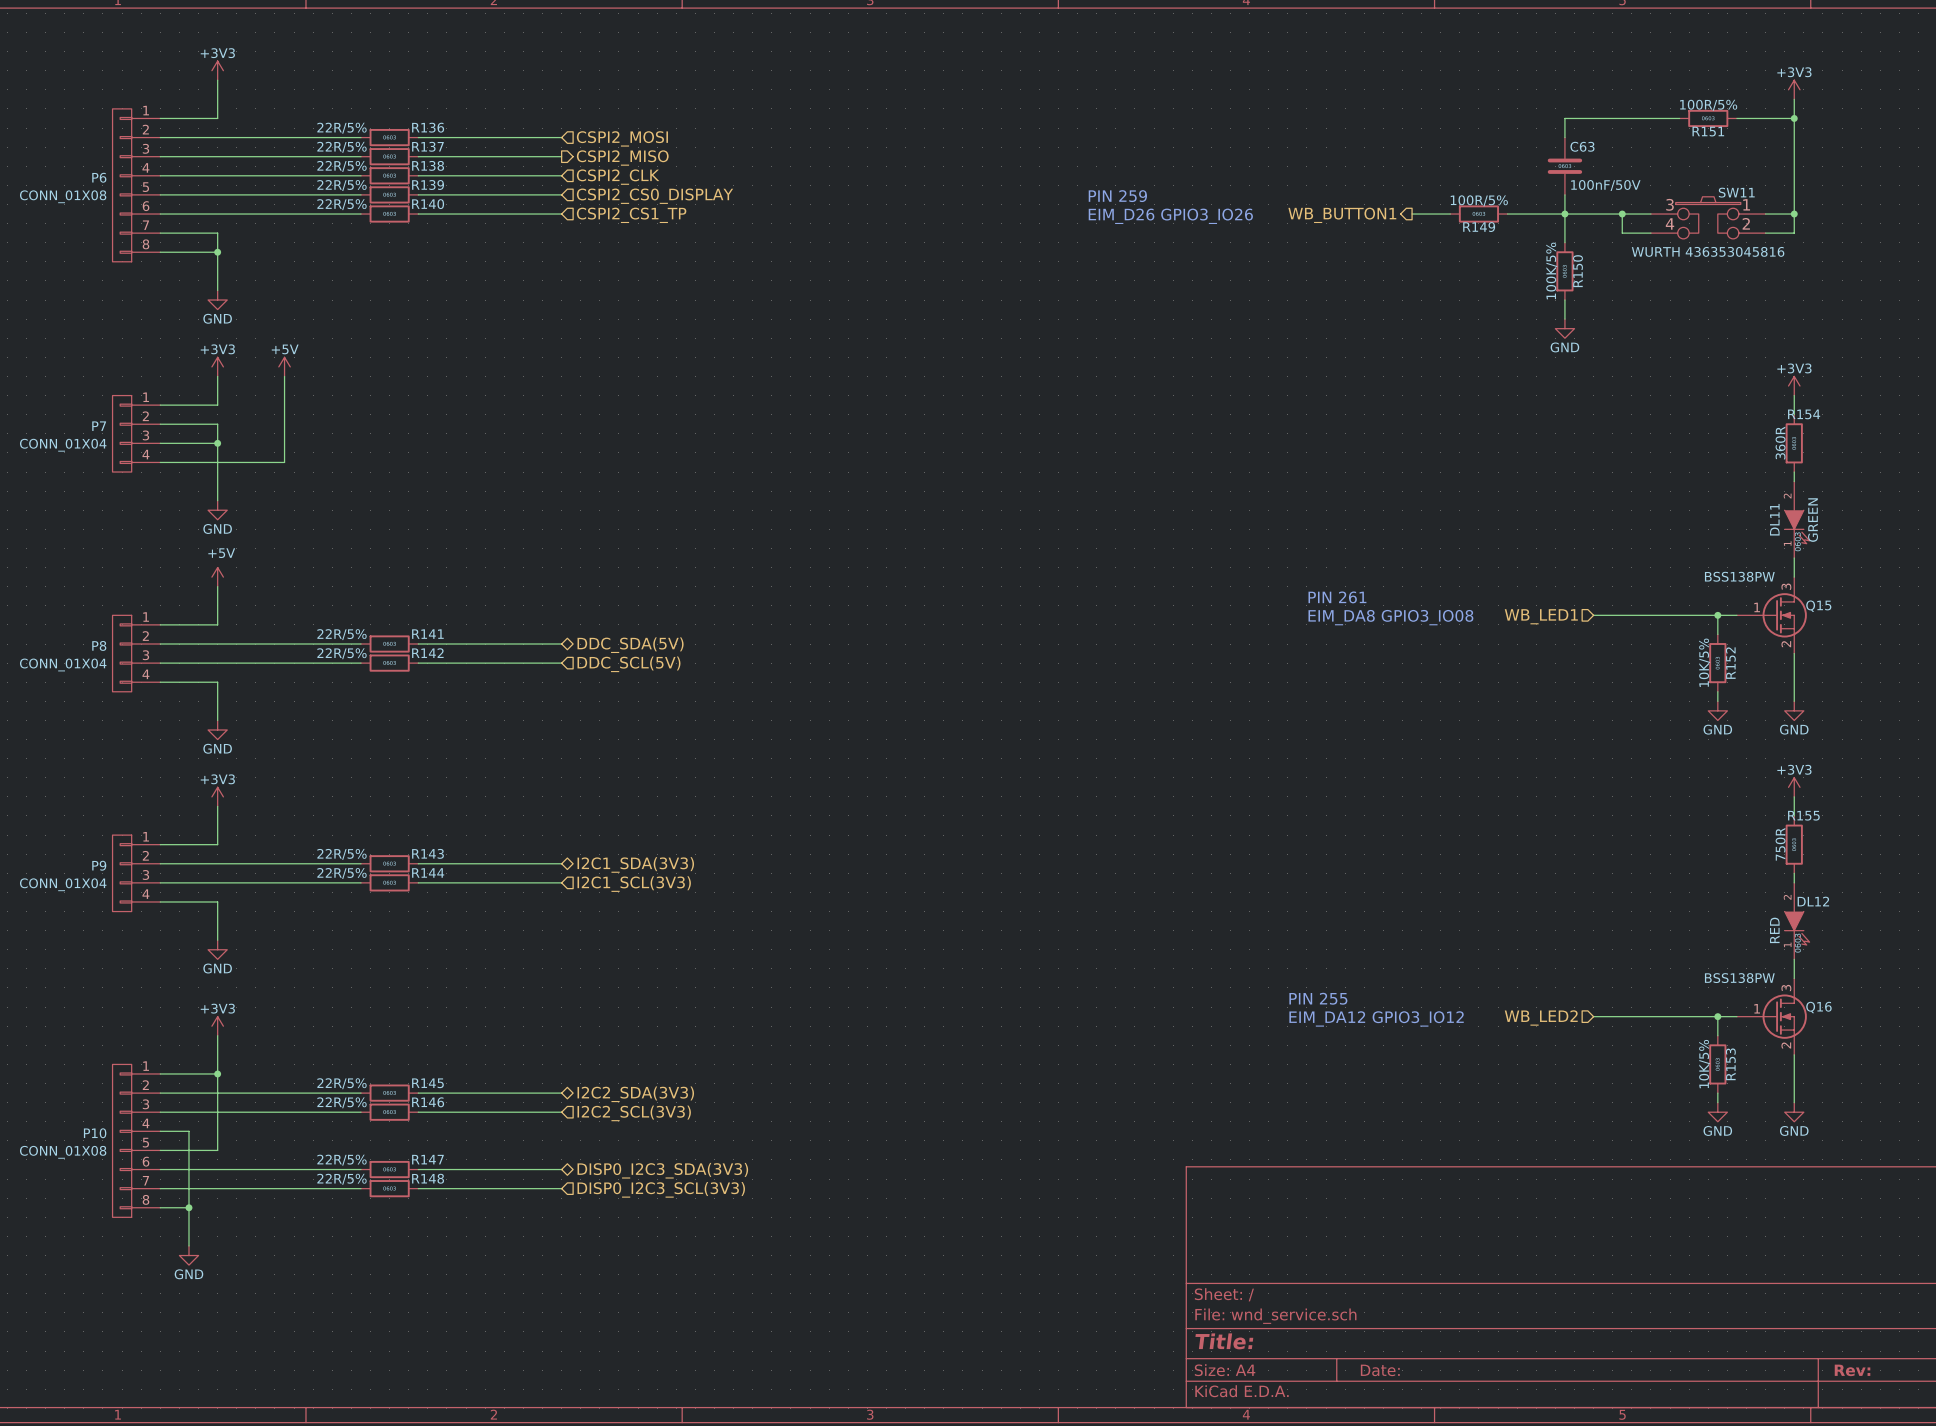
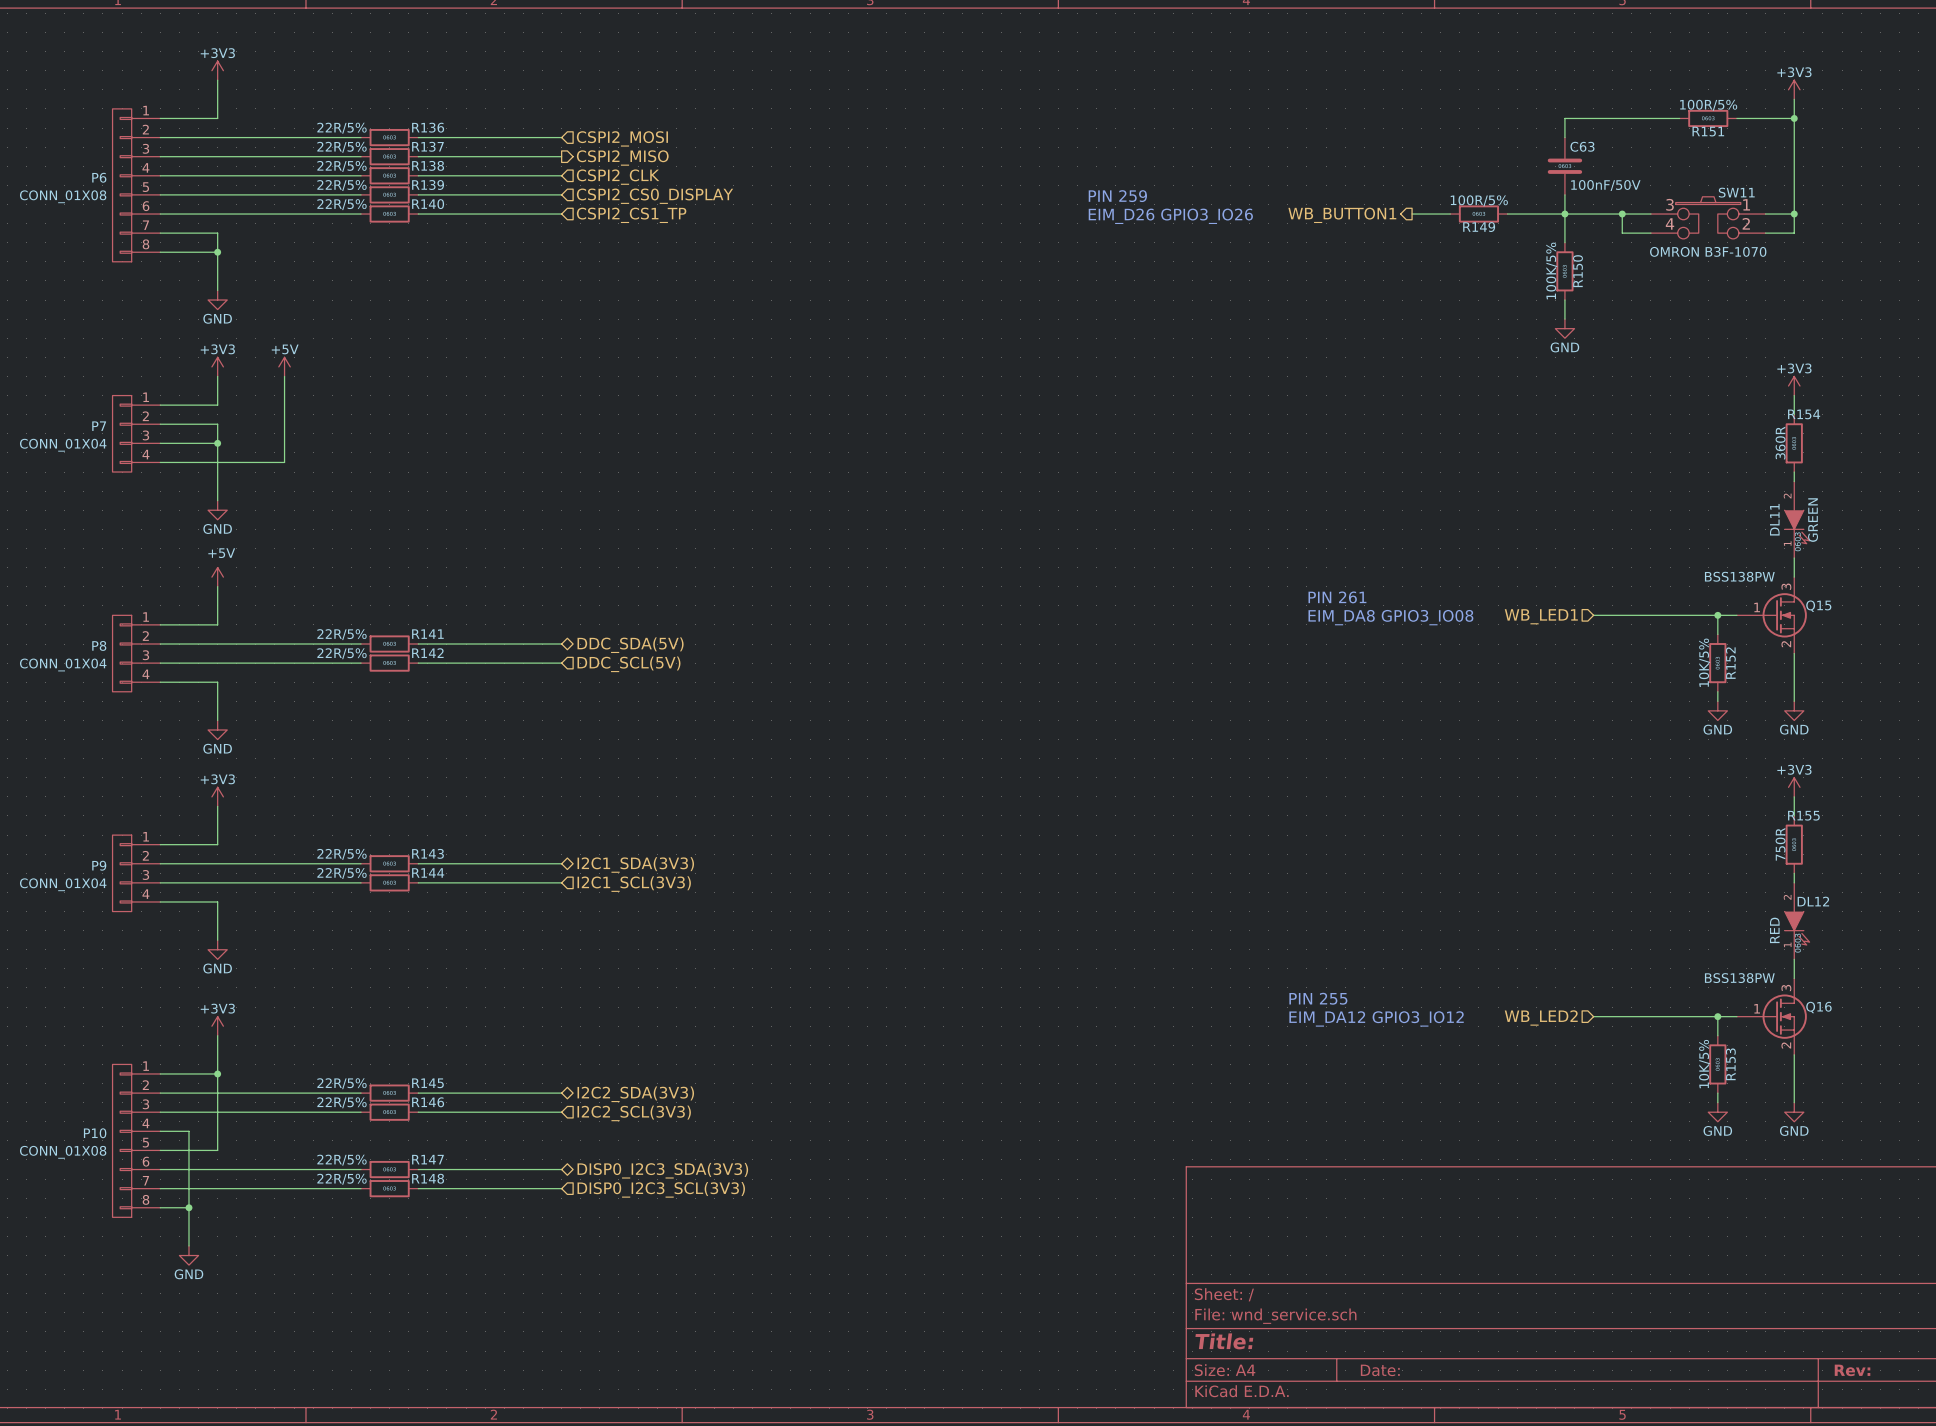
SW11 value: WURTH 436353045816 (1708, 251) -> OMRON B3F-1070 (1708, 251)

